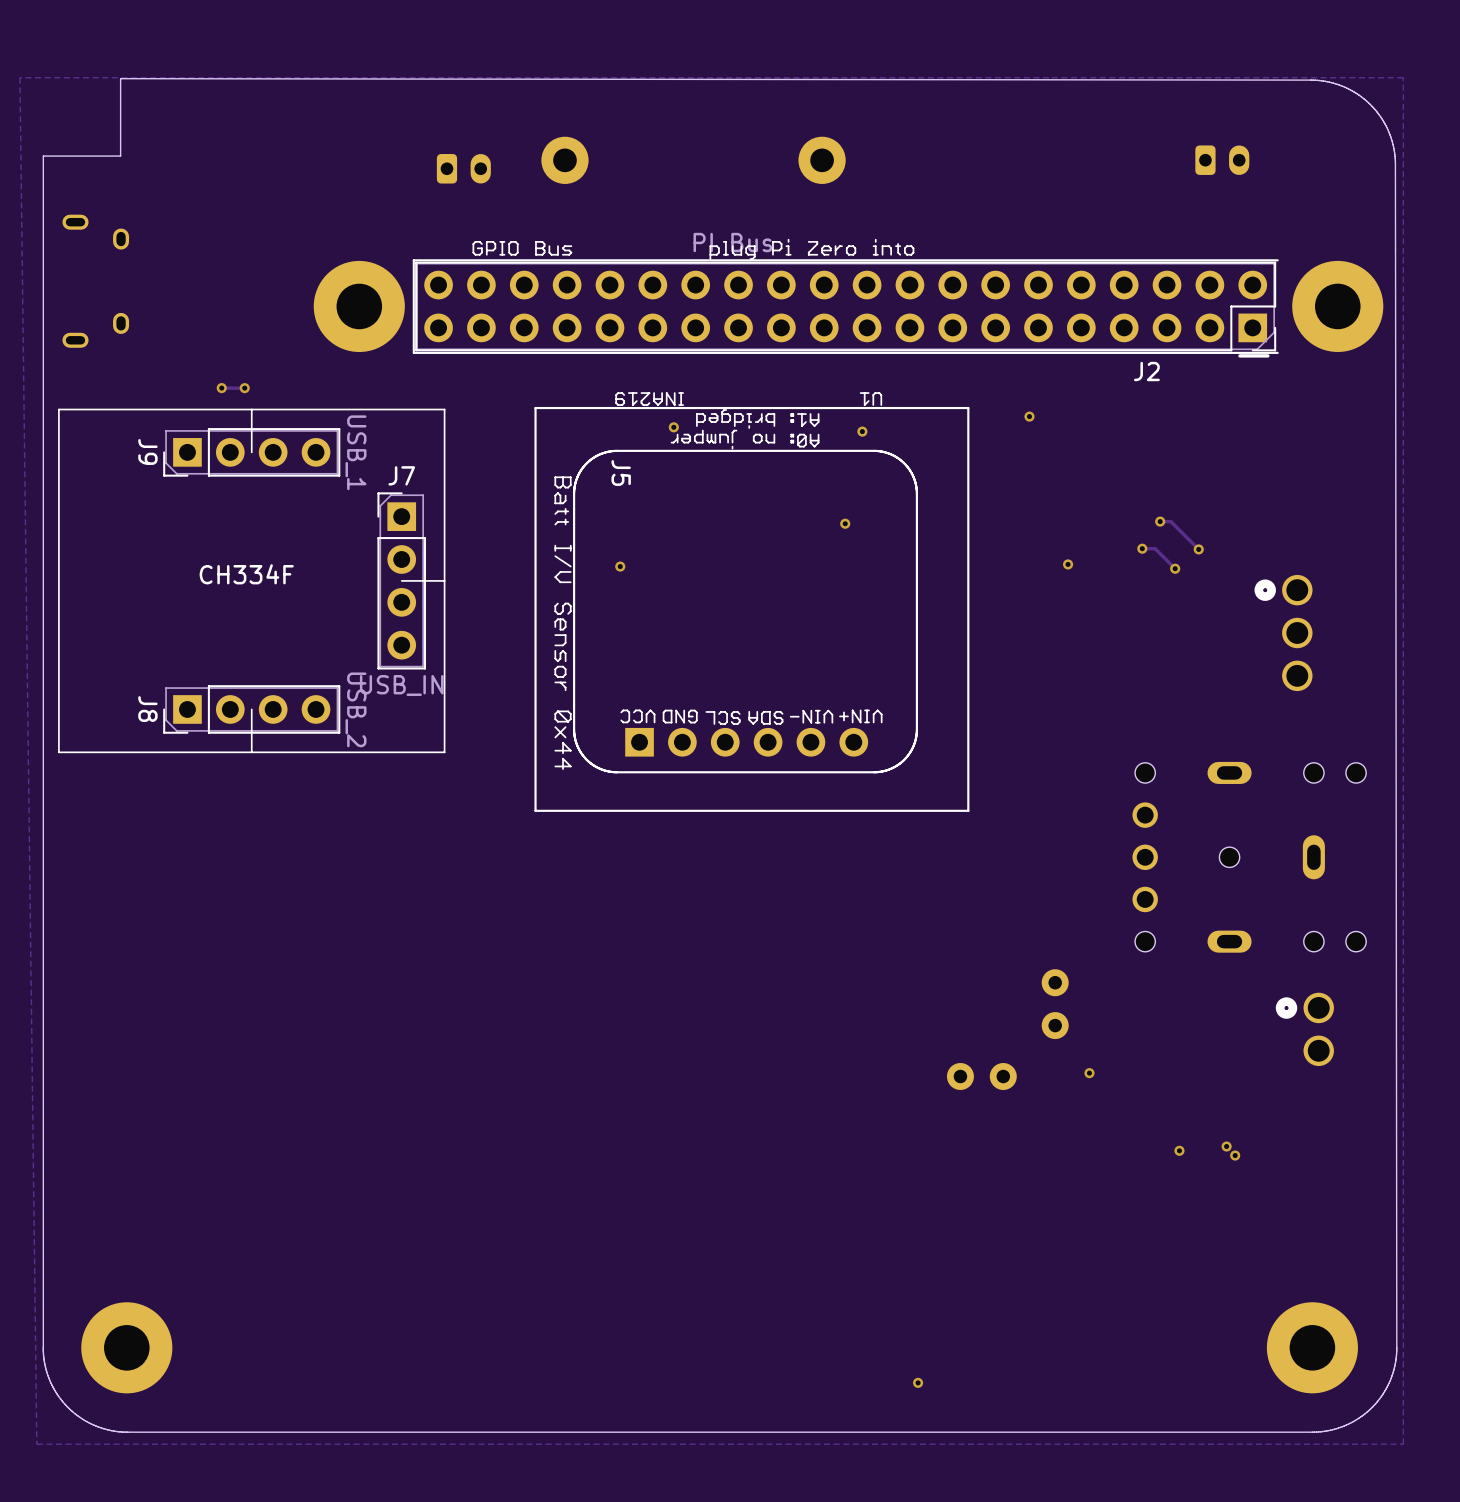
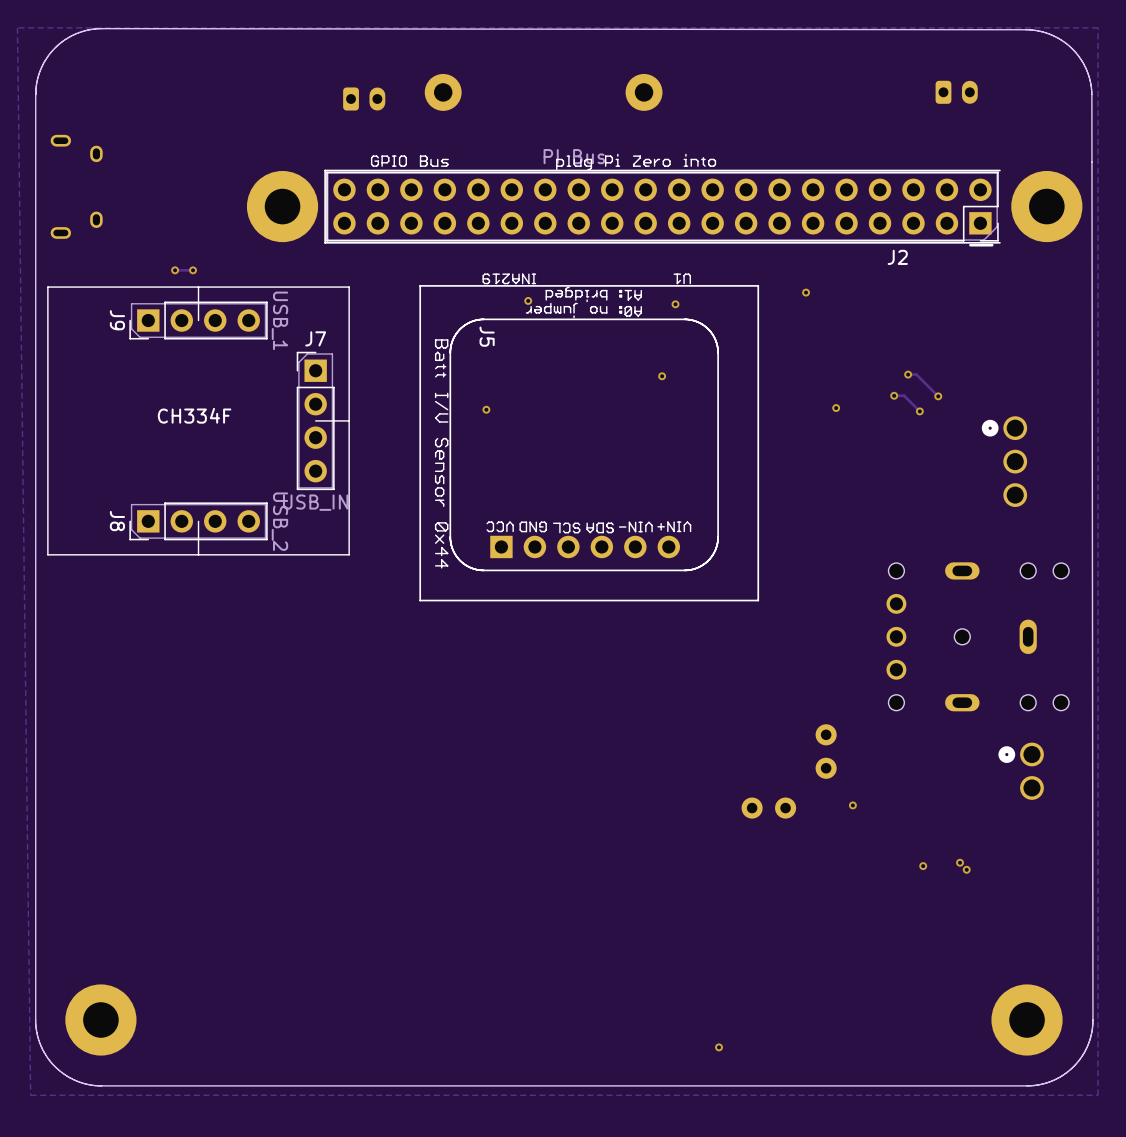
board edge: (128, 78) (120, 78) (120, 156) (43, 156) -> (101, 28) (77, 33) (54, 48) (40, 69) (35, 94)

